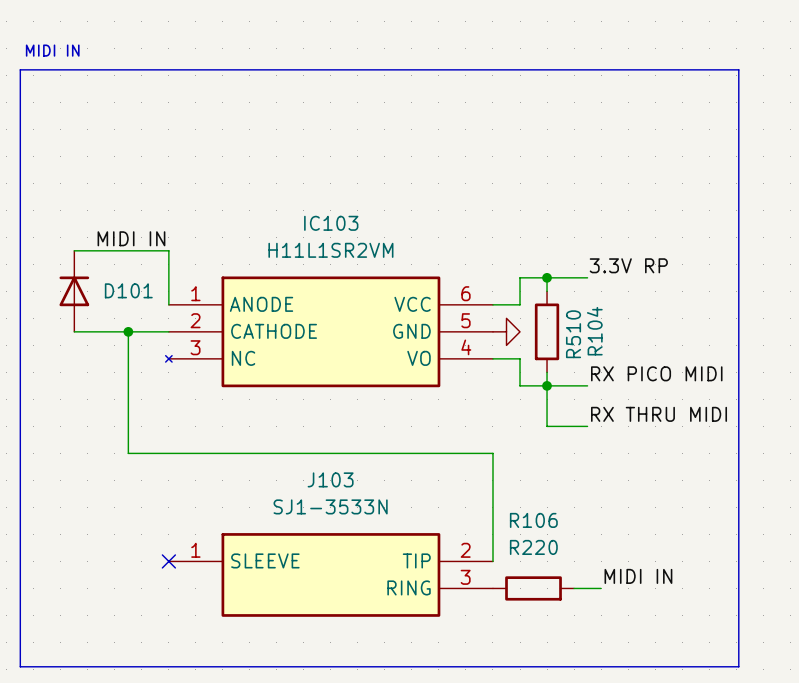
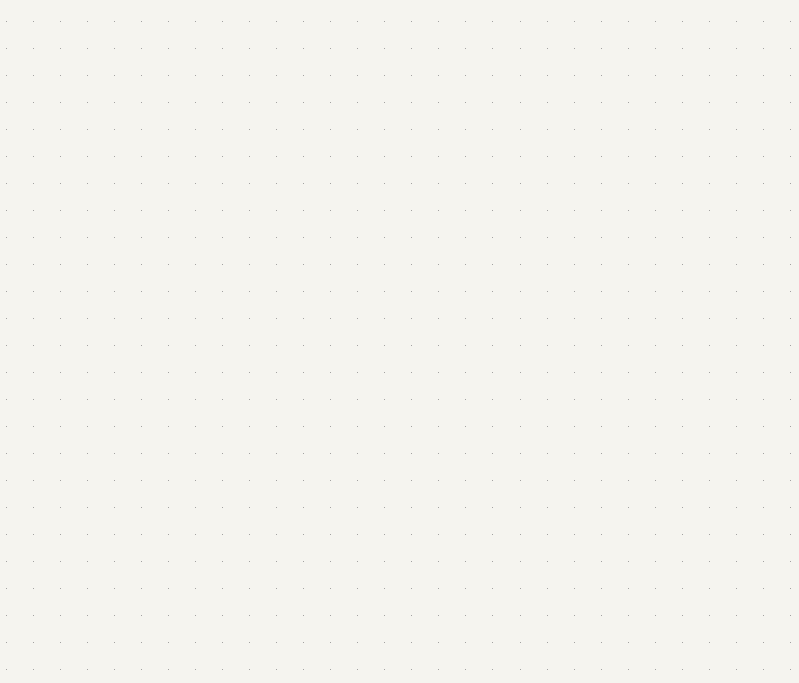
text: MIDI IN (52, 50) -> none
line: (20, 69) (738, 69) (738, 666) (20, 666) (20, 69) -> none
label: MIDI IN (131, 238) -> none
wire: (74, 250) (168, 250) (168, 304) -> none
label: 3.3V RP (628, 265) -> none
wire: (547, 277) (547, 291) -> none
junction: (547, 277) -> none
wire: (587, 277) (520, 277) (520, 304) (492, 304) -> none
D101: (74, 291) -> none
wire: (74, 331) (168, 331) -> none
wire: (128, 331) (128, 453) (492, 453) (492, 561) -> none
junction: (128, 331) -> none
IC103: H11L1SR2VM (329, 331) -> none
power symbol: (506, 331) -> none
R104: R510 (547, 331) -> none
wire: (492, 358) (520, 358) (520, 385) (587, 385) -> none
wire: (547, 372) (547, 426) (587, 426) -> none
label: RX PICO MIDI (656, 373) -> none
junction: (547, 385) -> none
label: RX THRU MIDI (659, 414) -> none
no-connect mark: (168, 561) -> none
J103: SJ1-3533N (330, 574) -> none
label: MIDI IN (638, 576) -> none
R106: R220 (533, 588) -> none
wire: (574, 588) (601, 588) -> none

